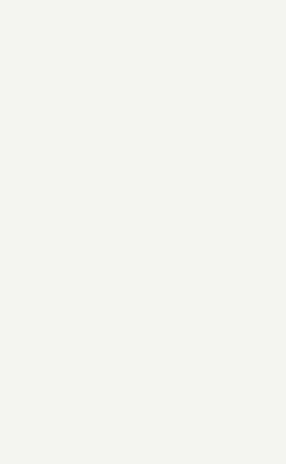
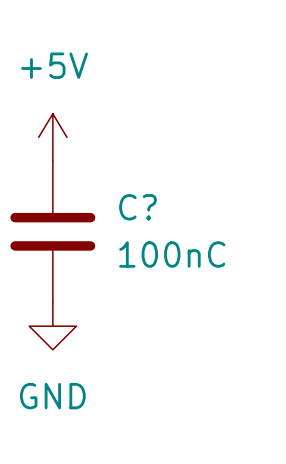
power symbol: none -> +5V (52, 137)
C?: none -> 100nC (52, 231)
power symbol: none -> GND (52, 326)

